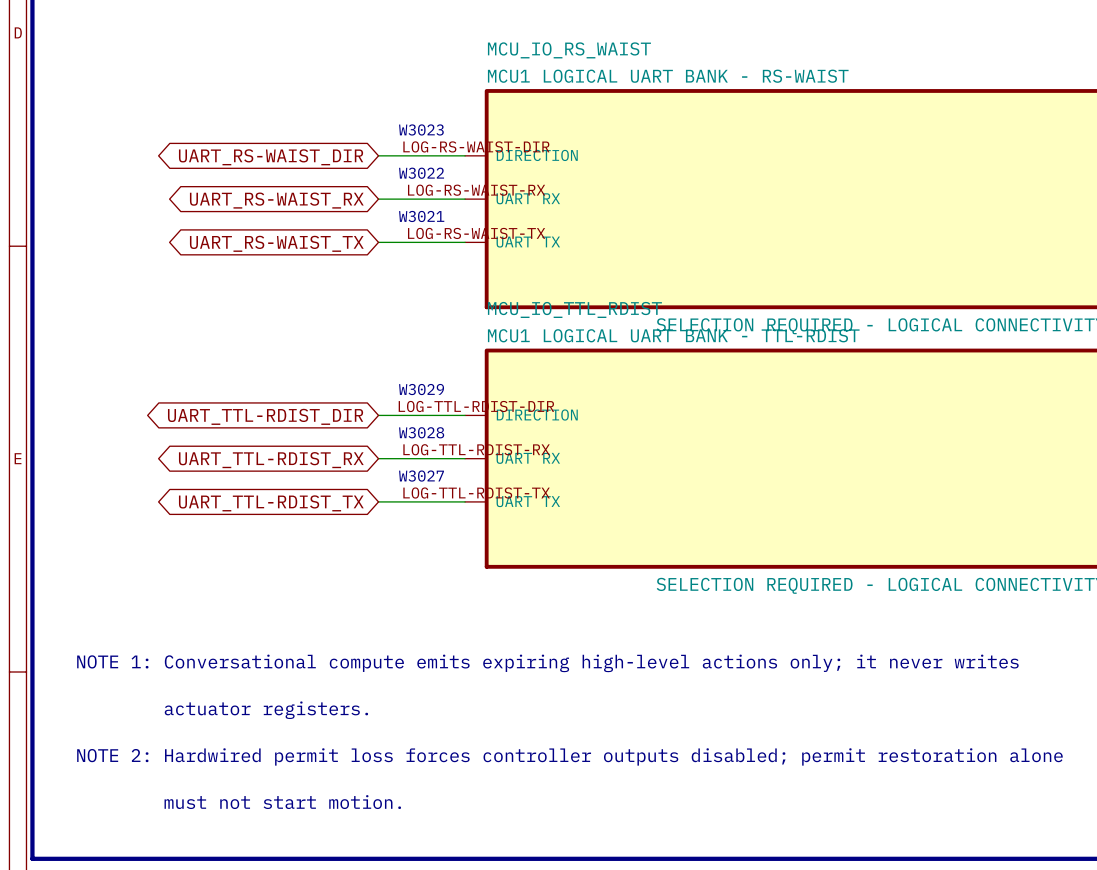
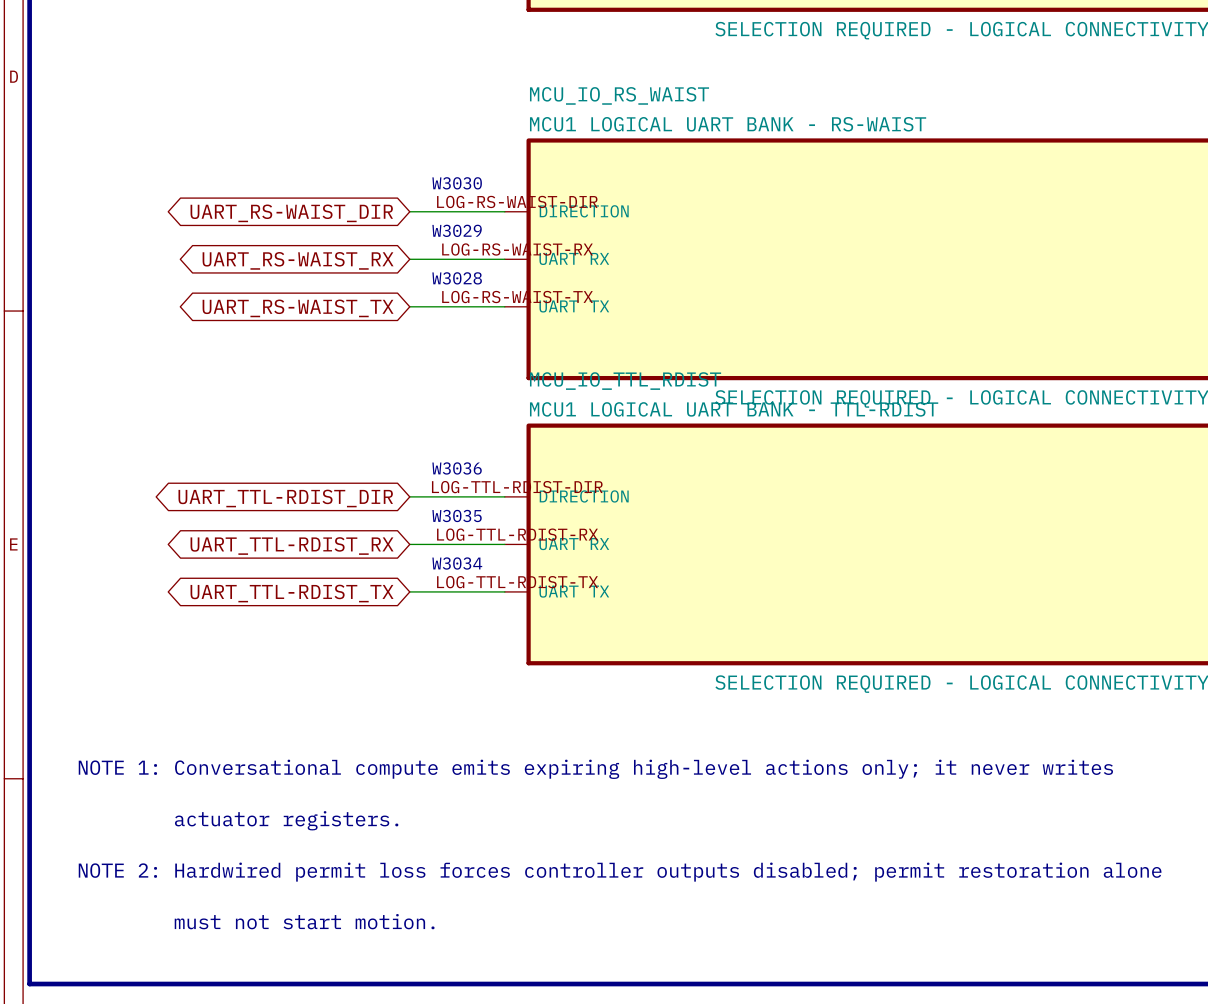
text: W3023 (421, 129) -> W3030 (457, 183)
text: W3022 (421, 173) -> W3029 (457, 230)
text: W3021 (421, 216) -> W3028 (457, 278)
text: W3029 (421, 389) -> W3036 (457, 468)
text: W3028 (421, 432) -> W3035 (457, 515)
text: W3027 (421, 476) -> W3034 (457, 563)

